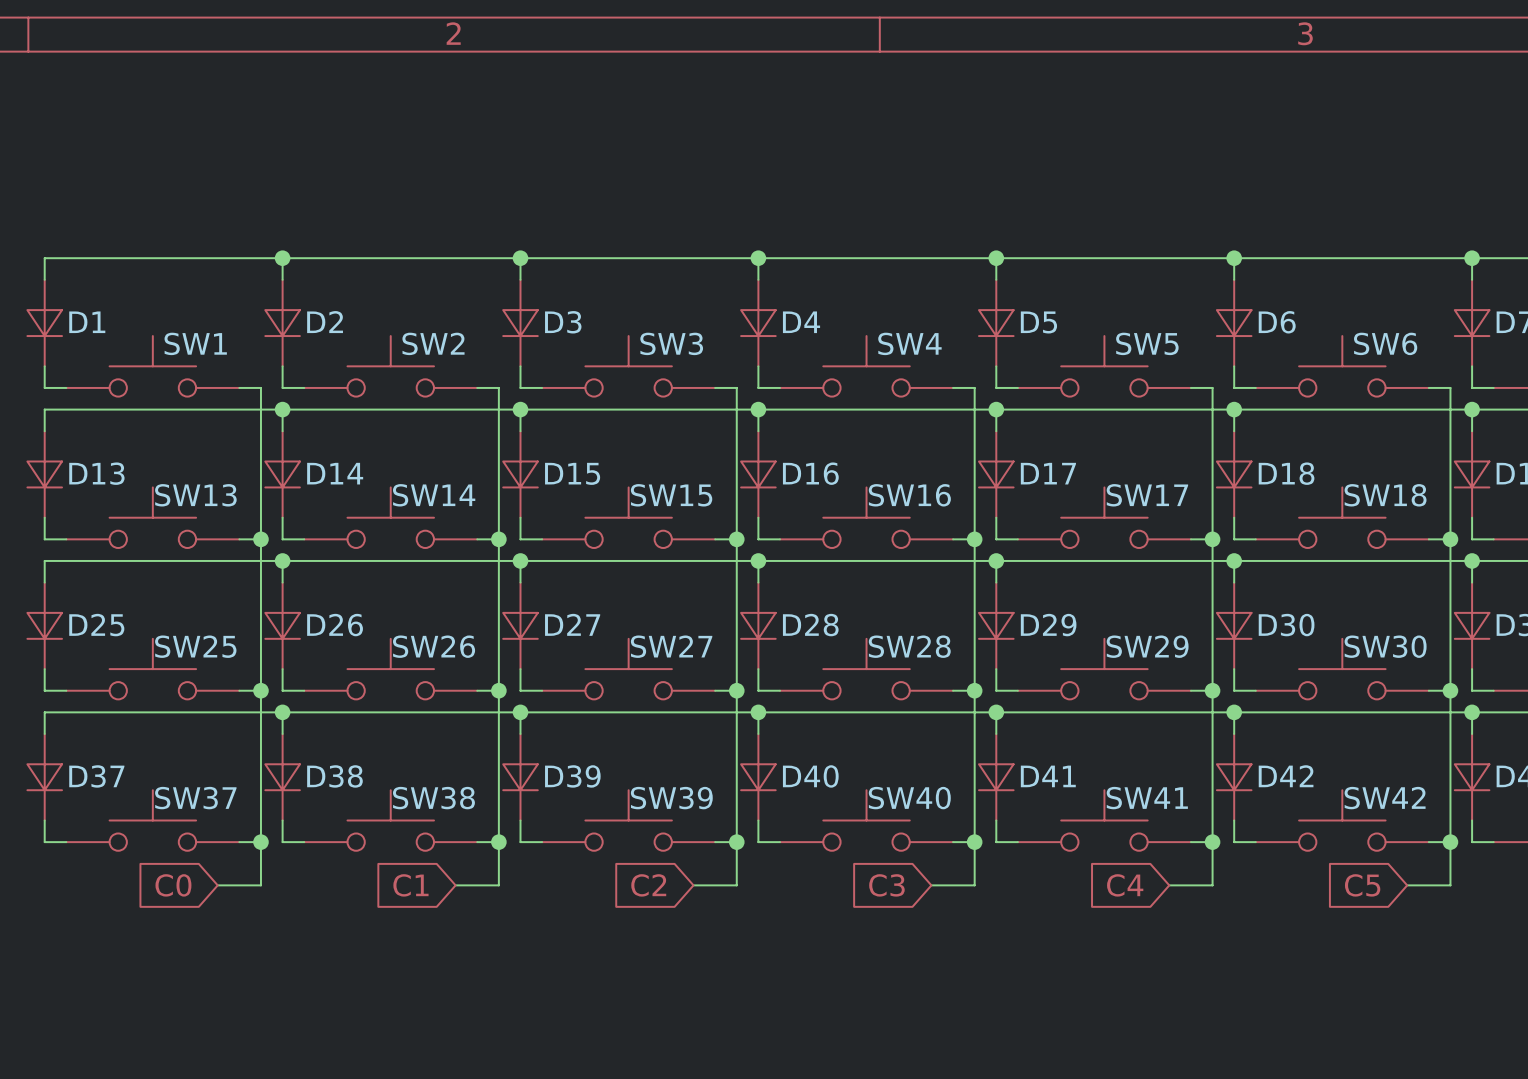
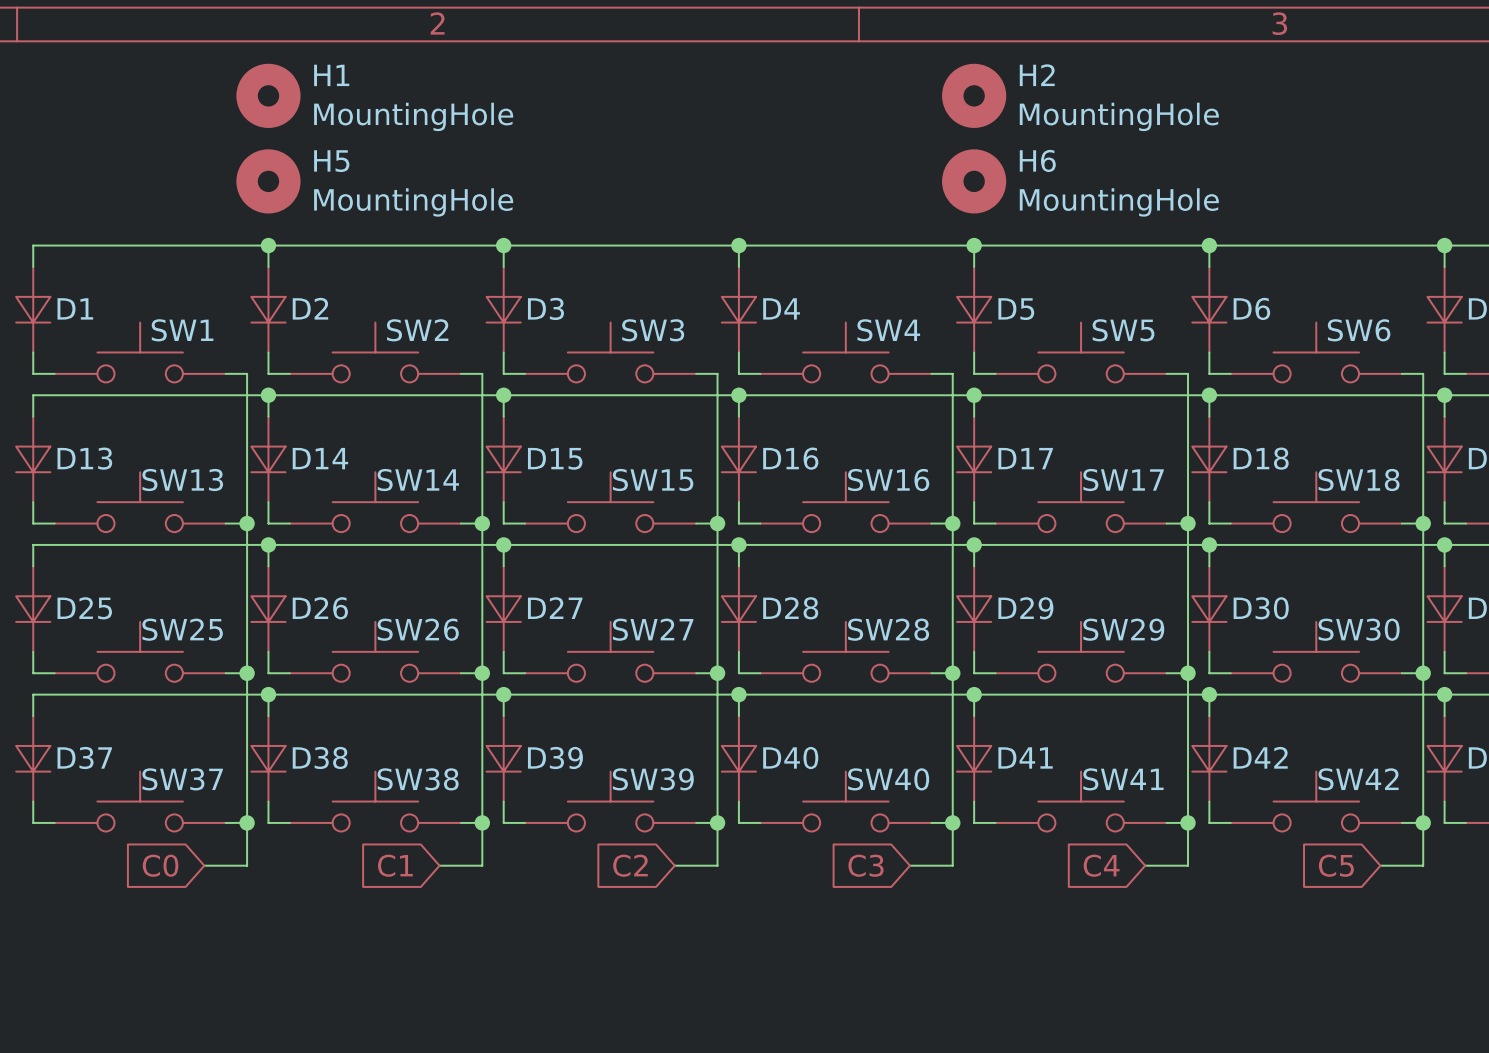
H1: none -> MountingHole (268, 95)
H2: none -> MountingHole (974, 95)
H5: none -> MountingHole (268, 181)
H6: none -> MountingHole (974, 181)

